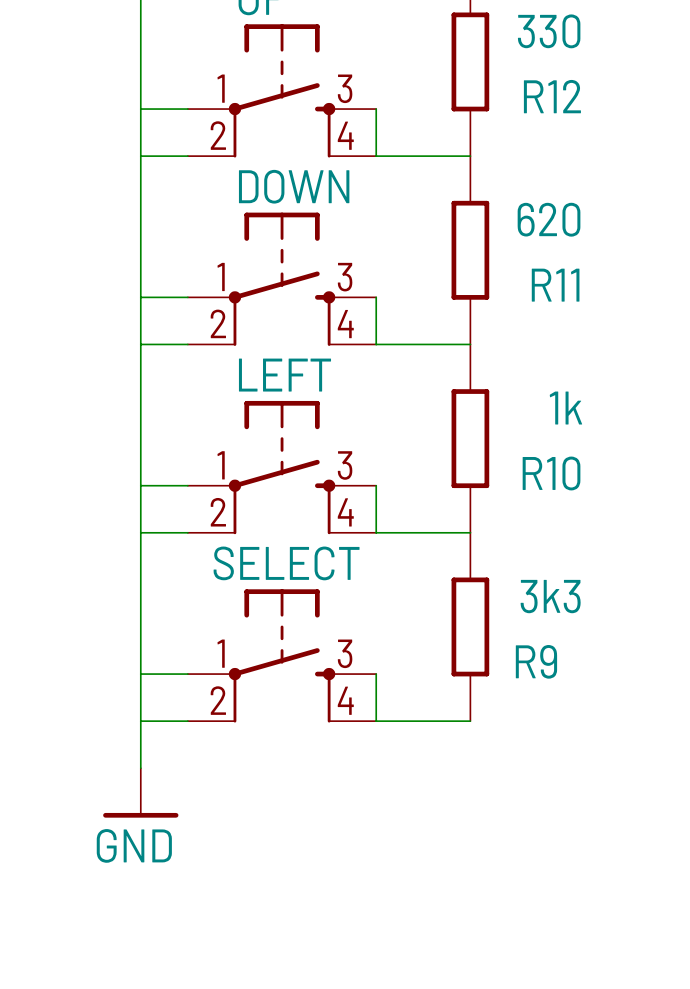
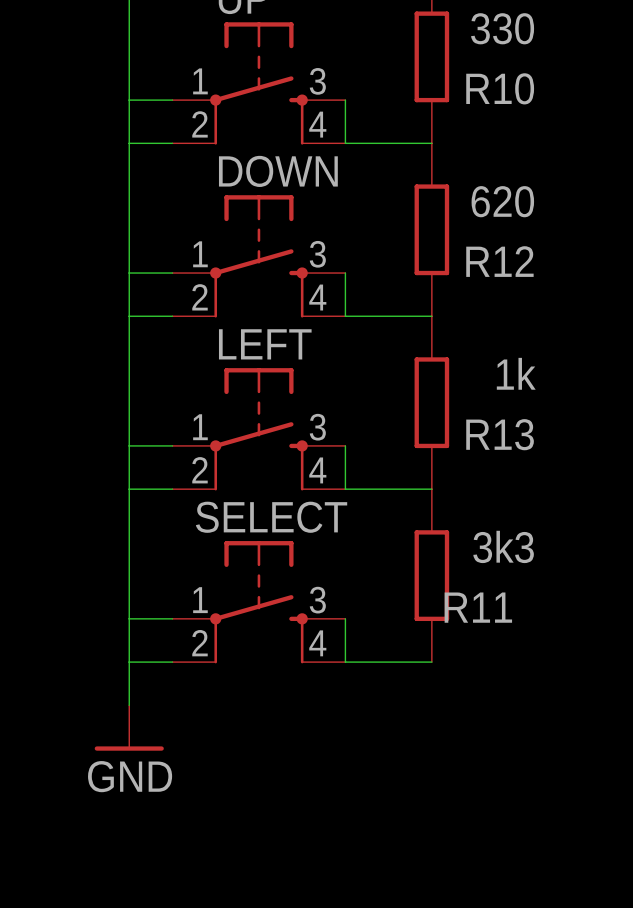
R12 name: R12 (552, 96) -> R10 (500, 88)
R11 name: R11 (555, 285) -> R12 (499, 261)
R10 name: R10 (551, 473) -> R13 (500, 434)
R9 name: R9 (536, 661) -> R11 (478, 607)

